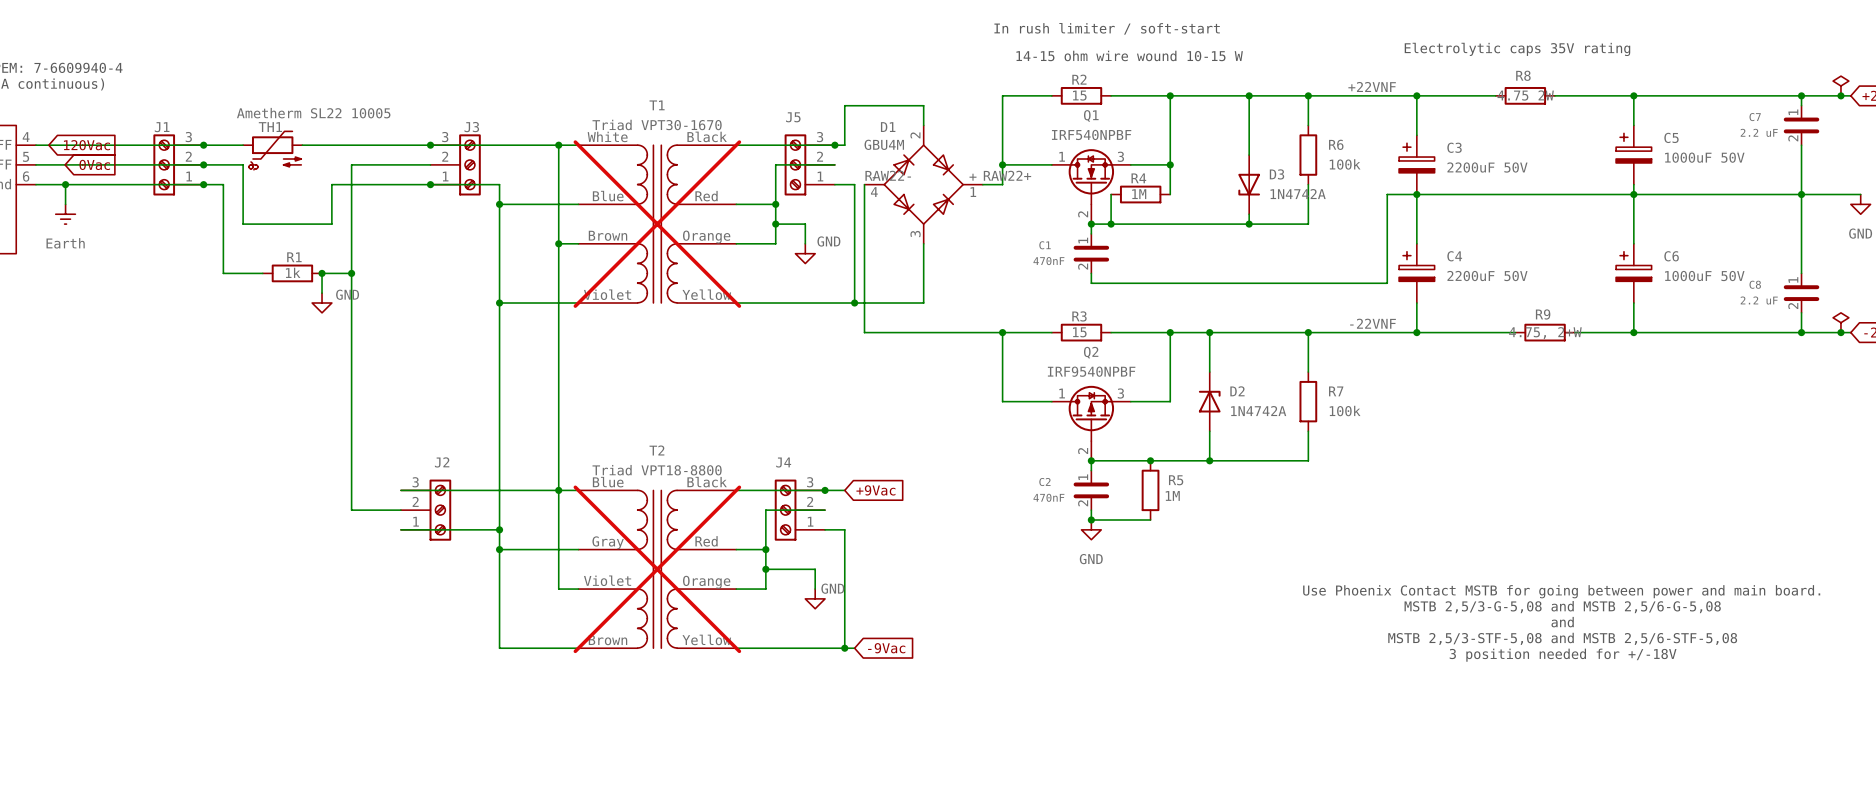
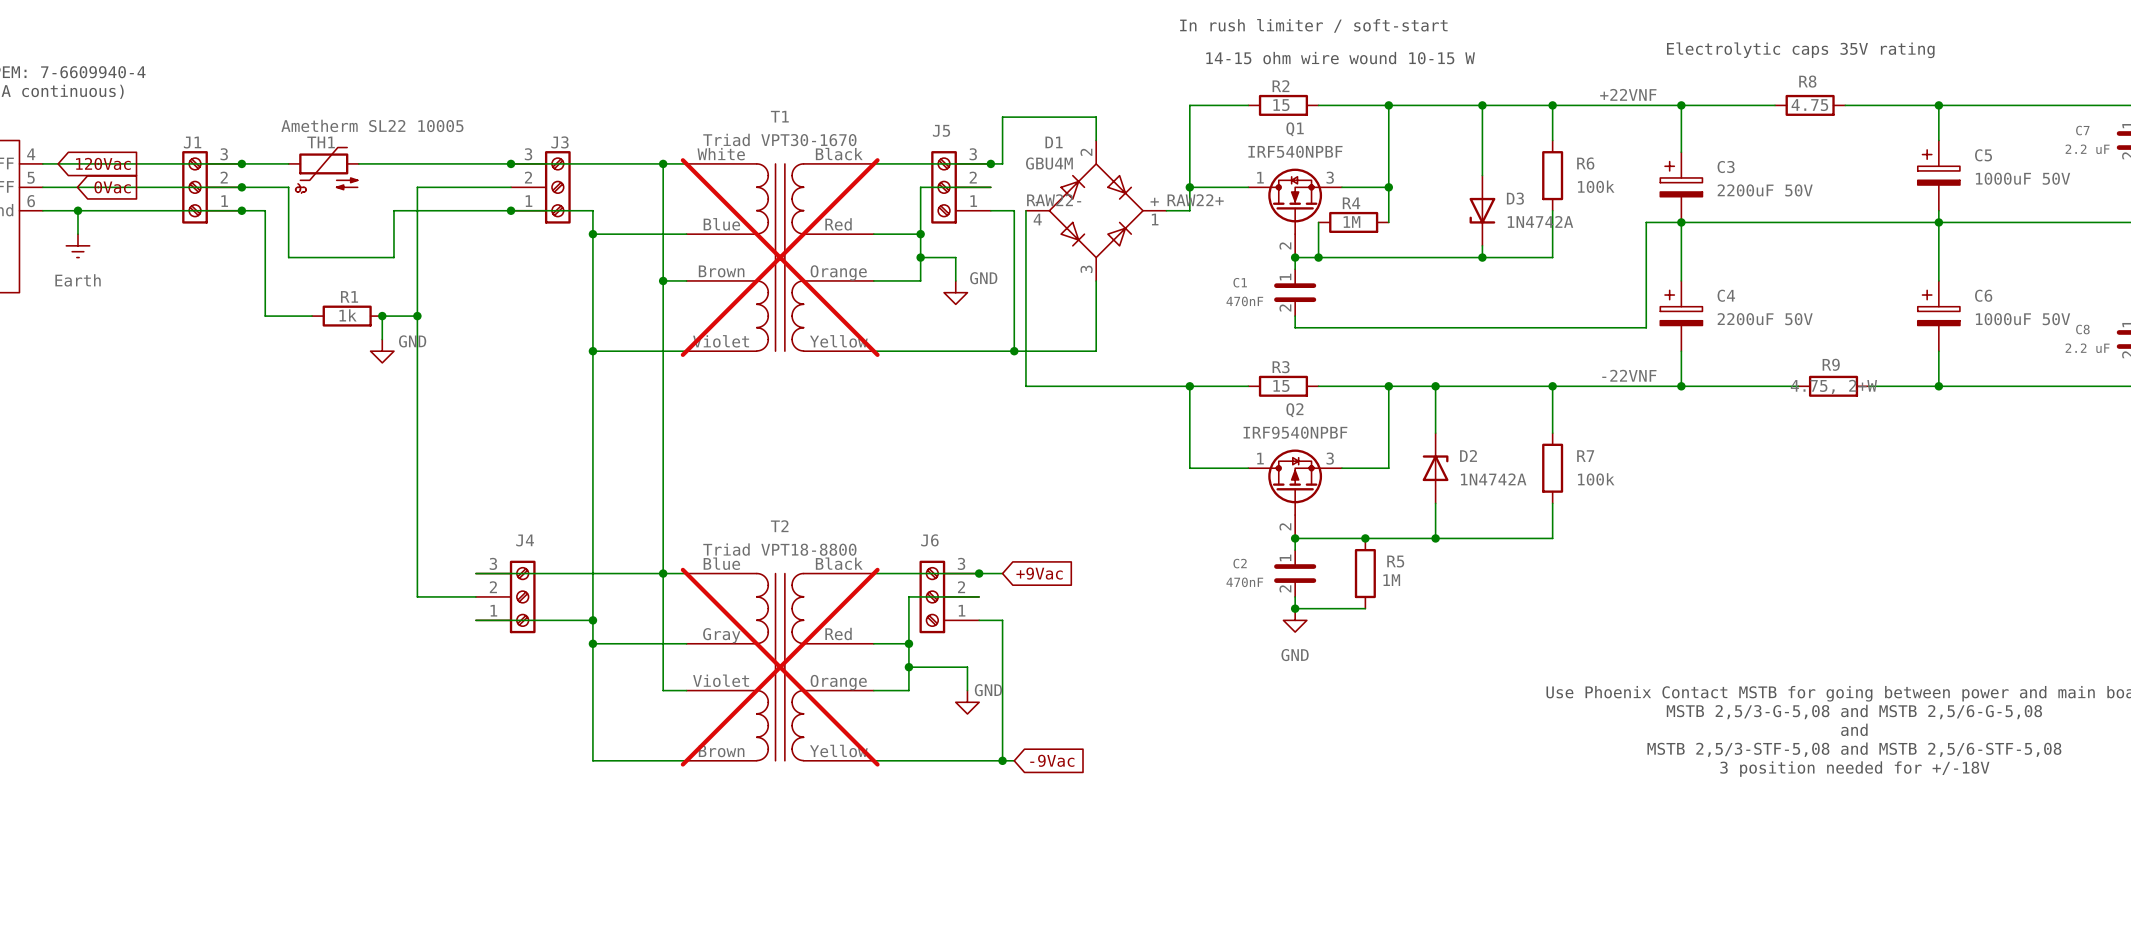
R8 value: 4.75 2W (1525, 95) -> 4.75 (1809, 105)
J2 name: J2 (442, 462) -> J4 (525, 540)
J4 name: J4 (783, 462) -> J6 (929, 540)

